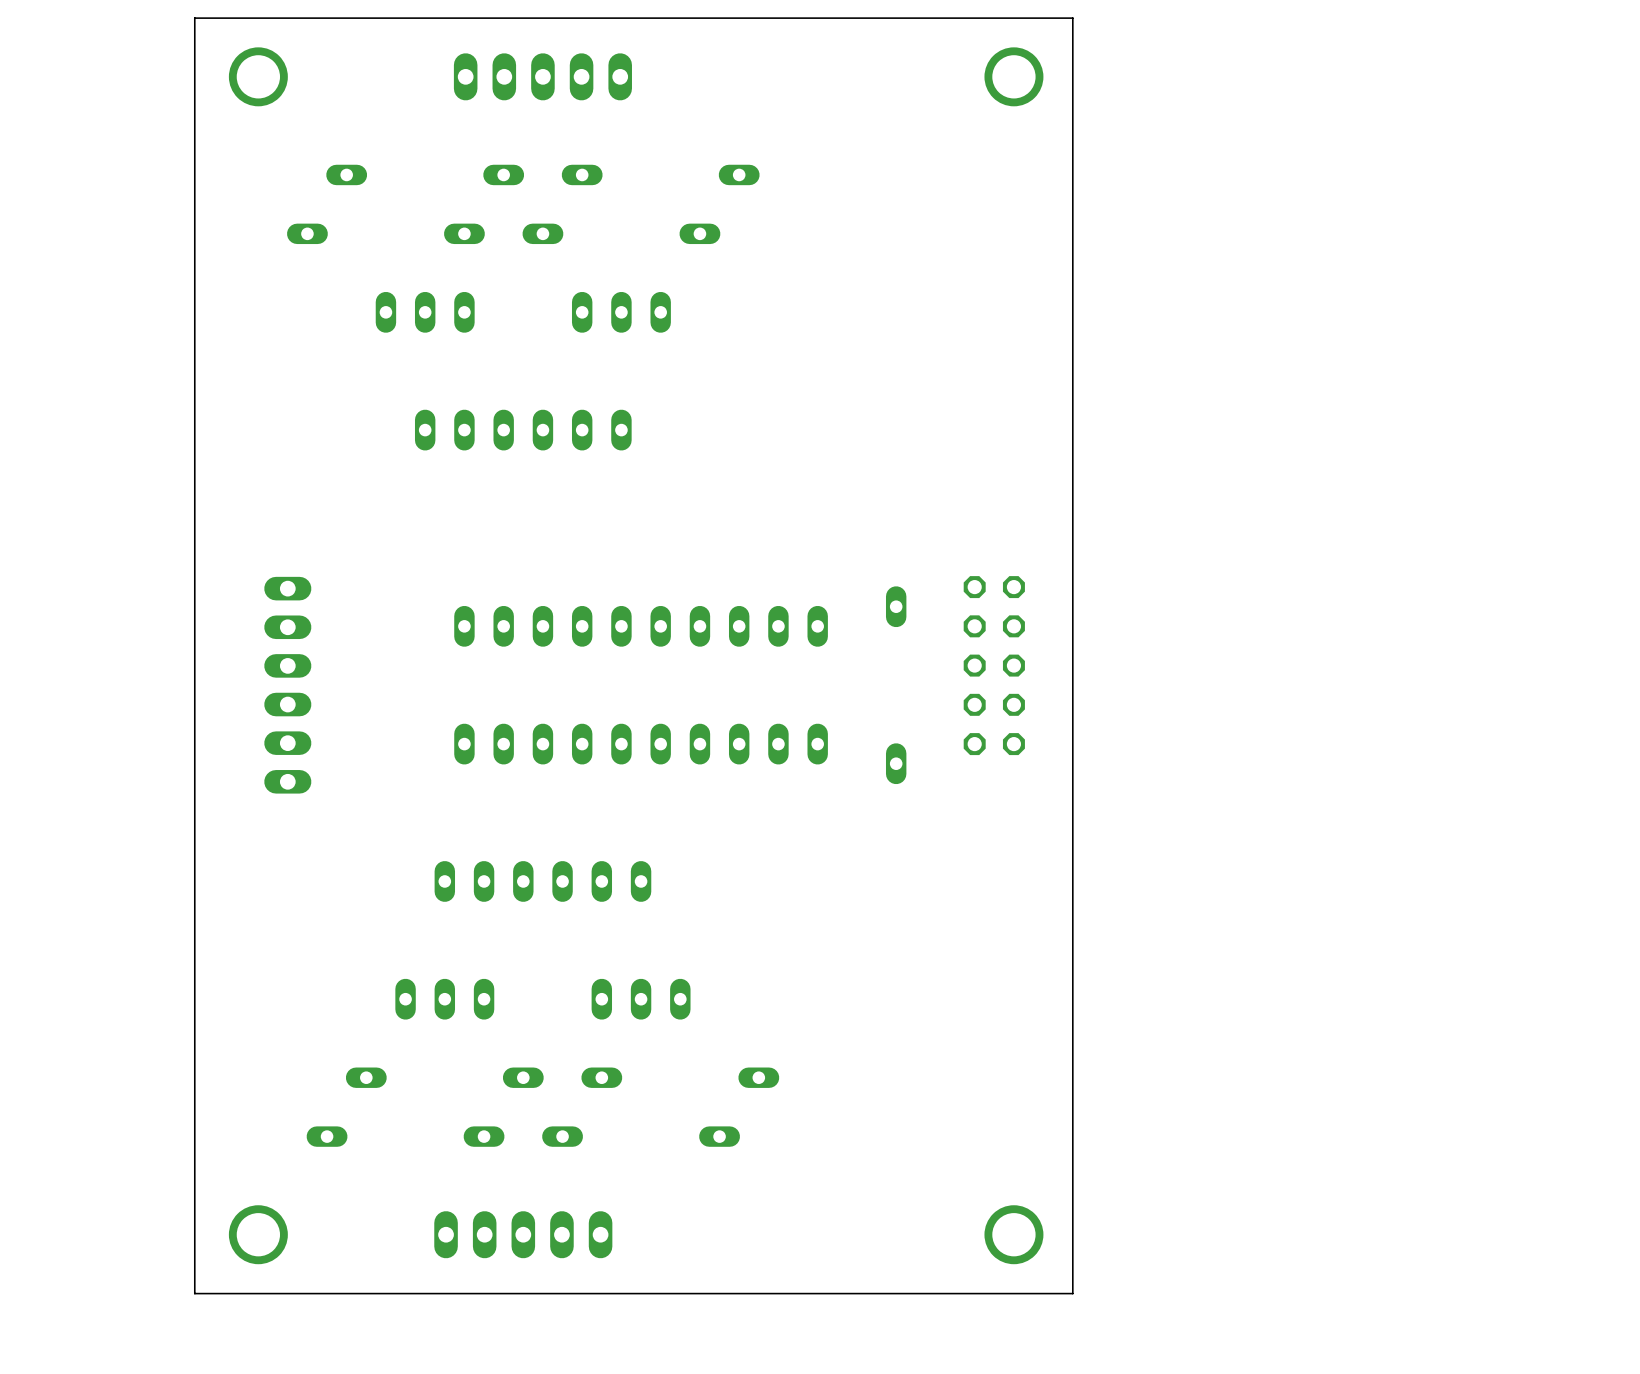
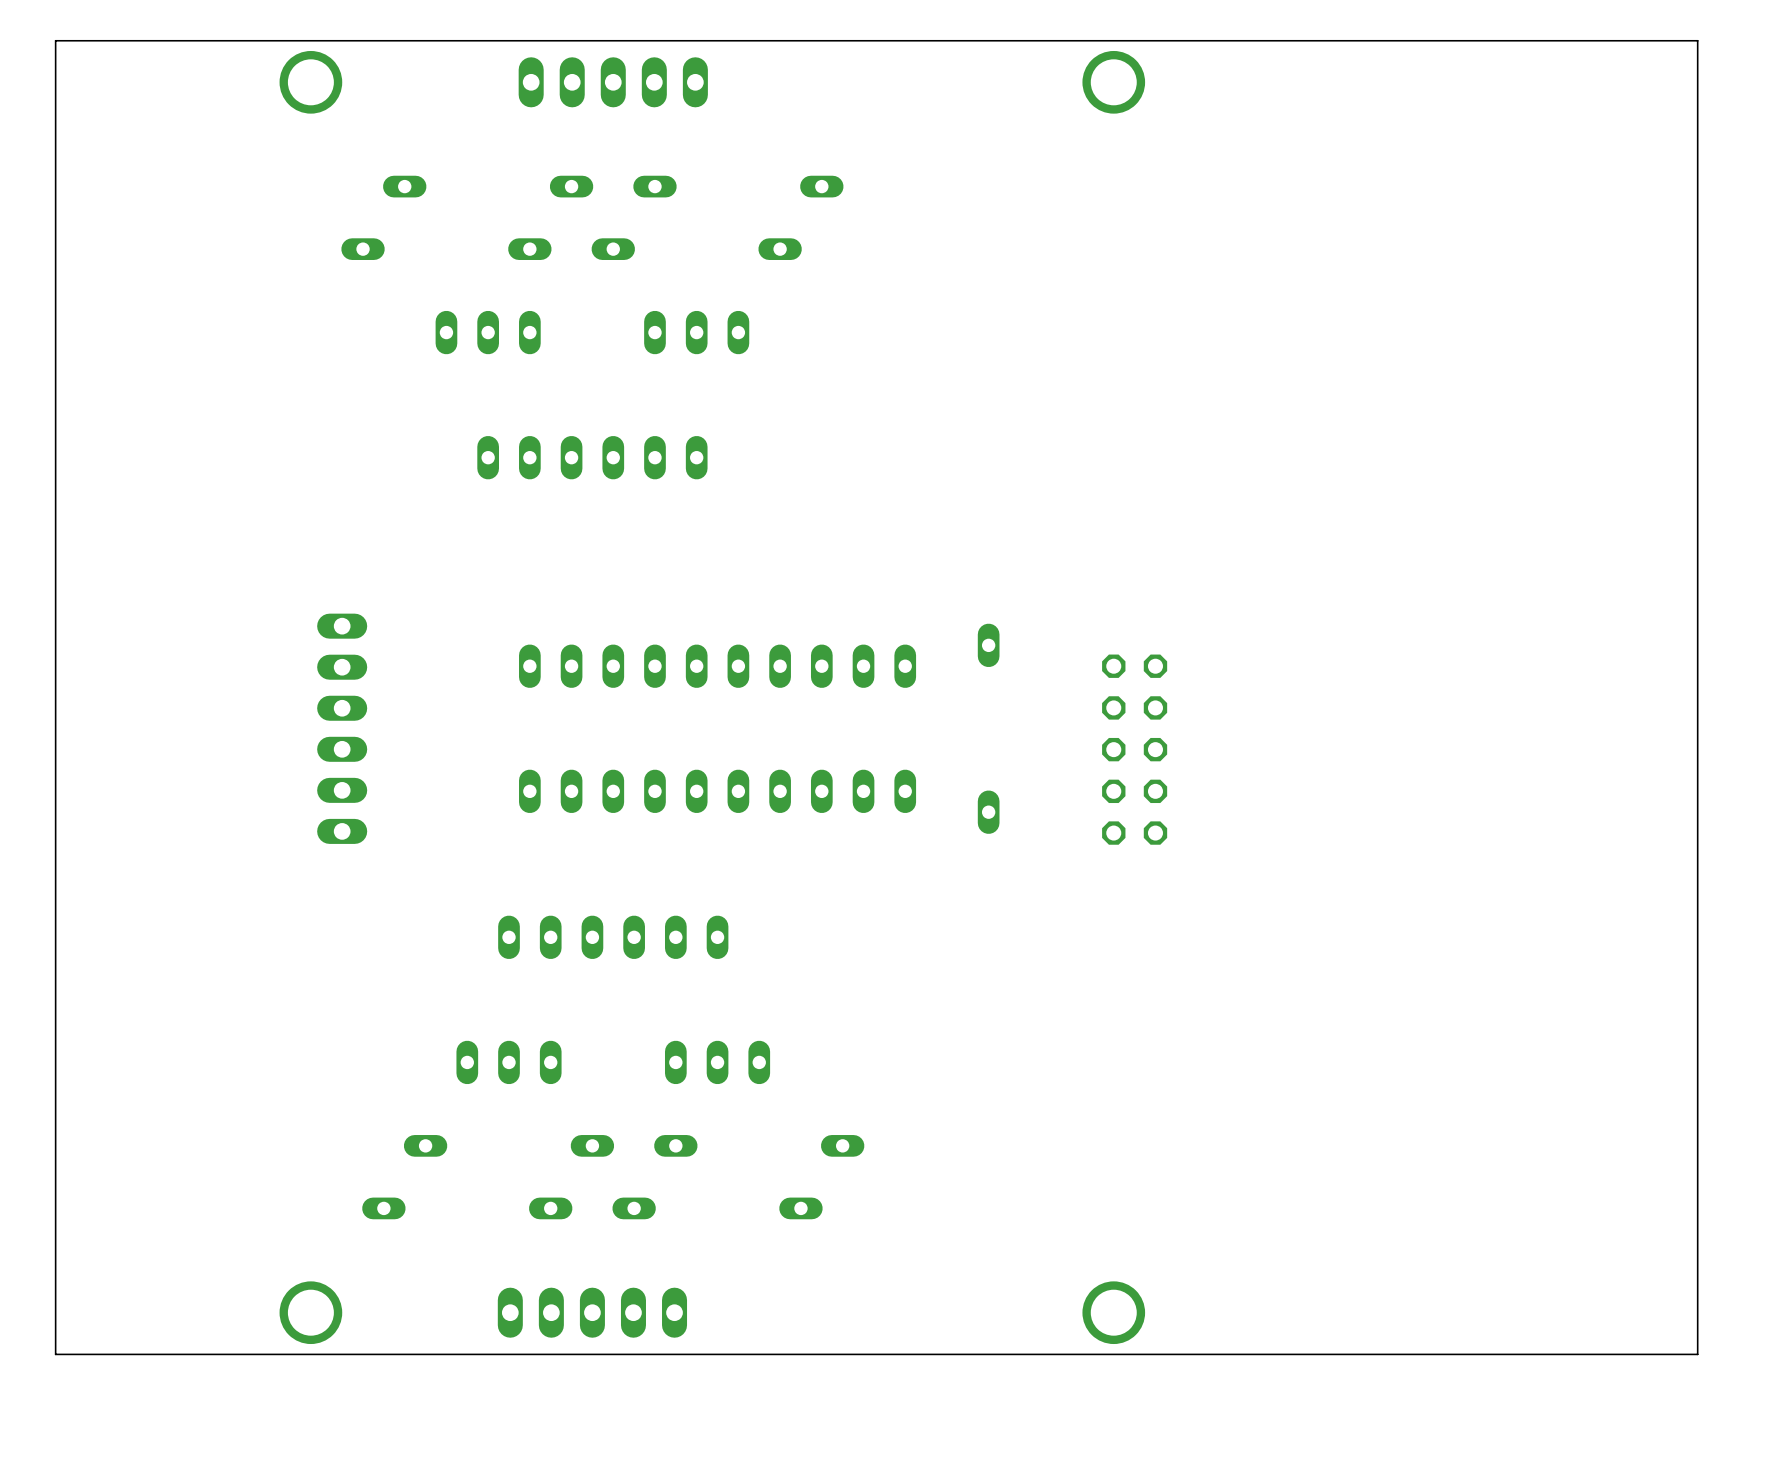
board edge: (1072, 18) (194, 18) (194, 1293) (1072, 1293) (1072, 18) -> (1697, 40) (1697, 1354) (55, 1354) (55, 40) (1697, 40)
part position: (994, 665) -> (1134, 749)

